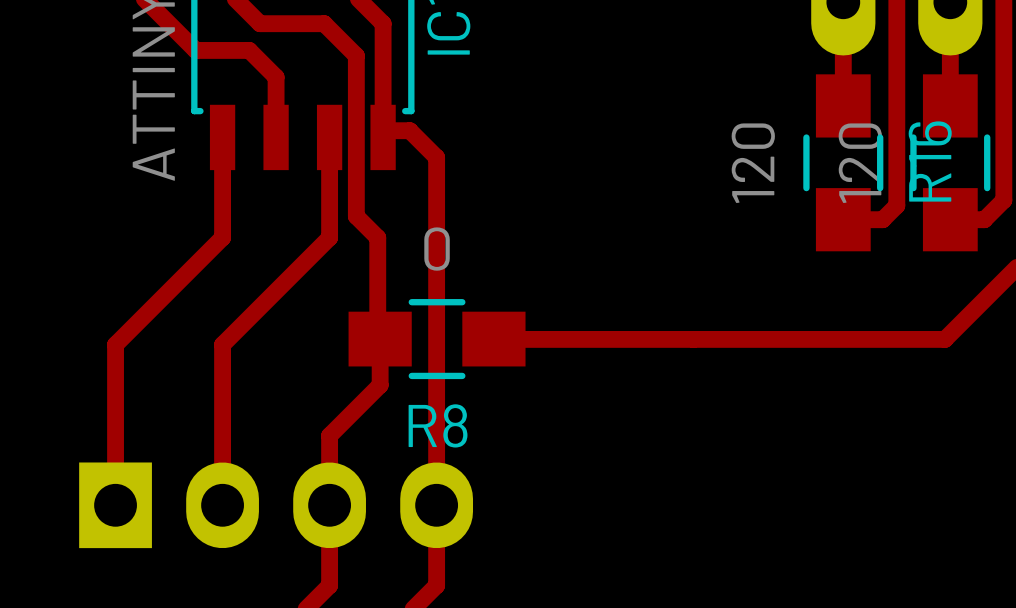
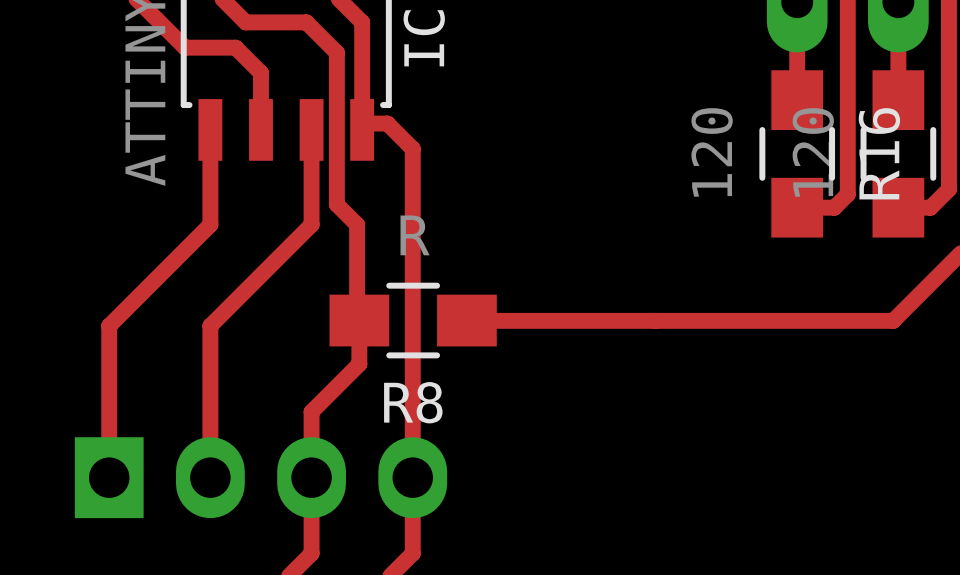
R8 value: 0 (437, 249) -> R (415, 235)

